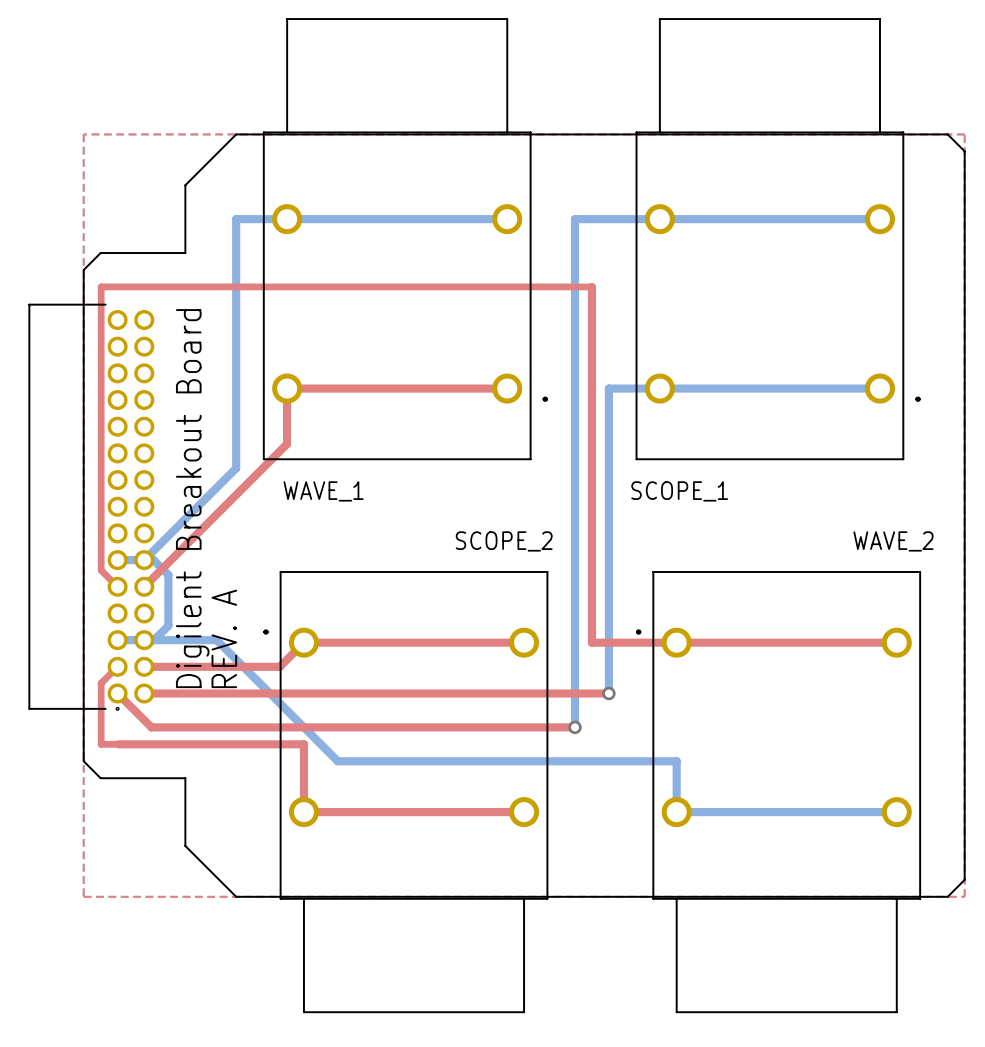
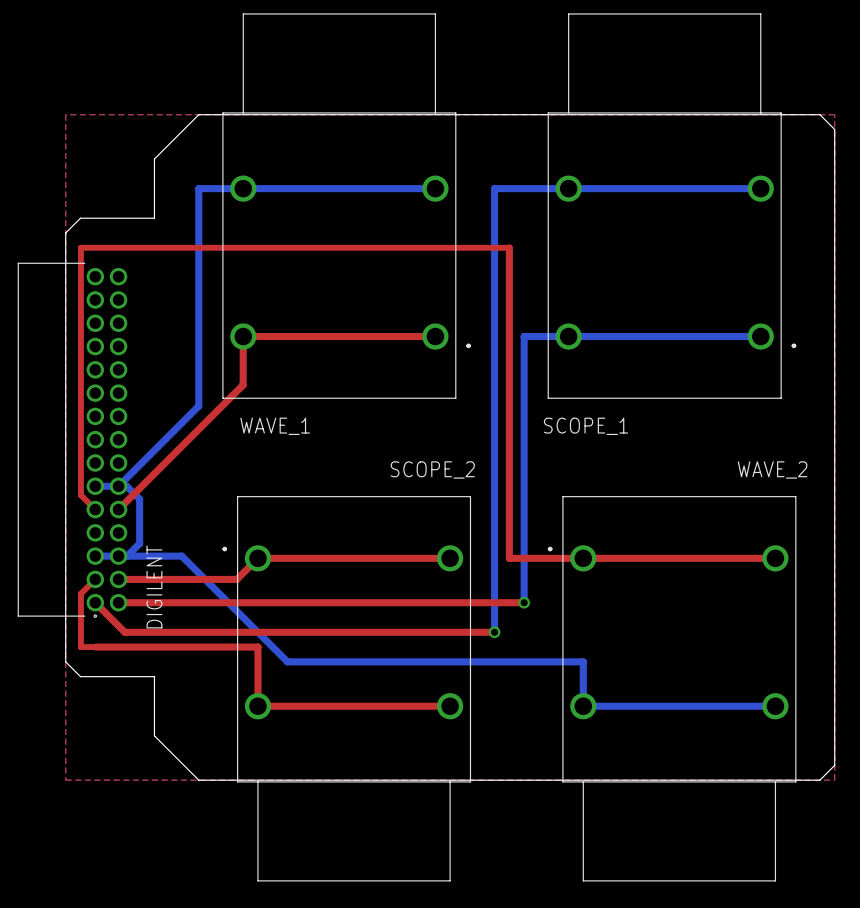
text: Digilent Breakout Board (192, 498) -> none
text: REV. A (224, 638) -> none
DIGILENT name: none -> DIGILENT (154, 586)

